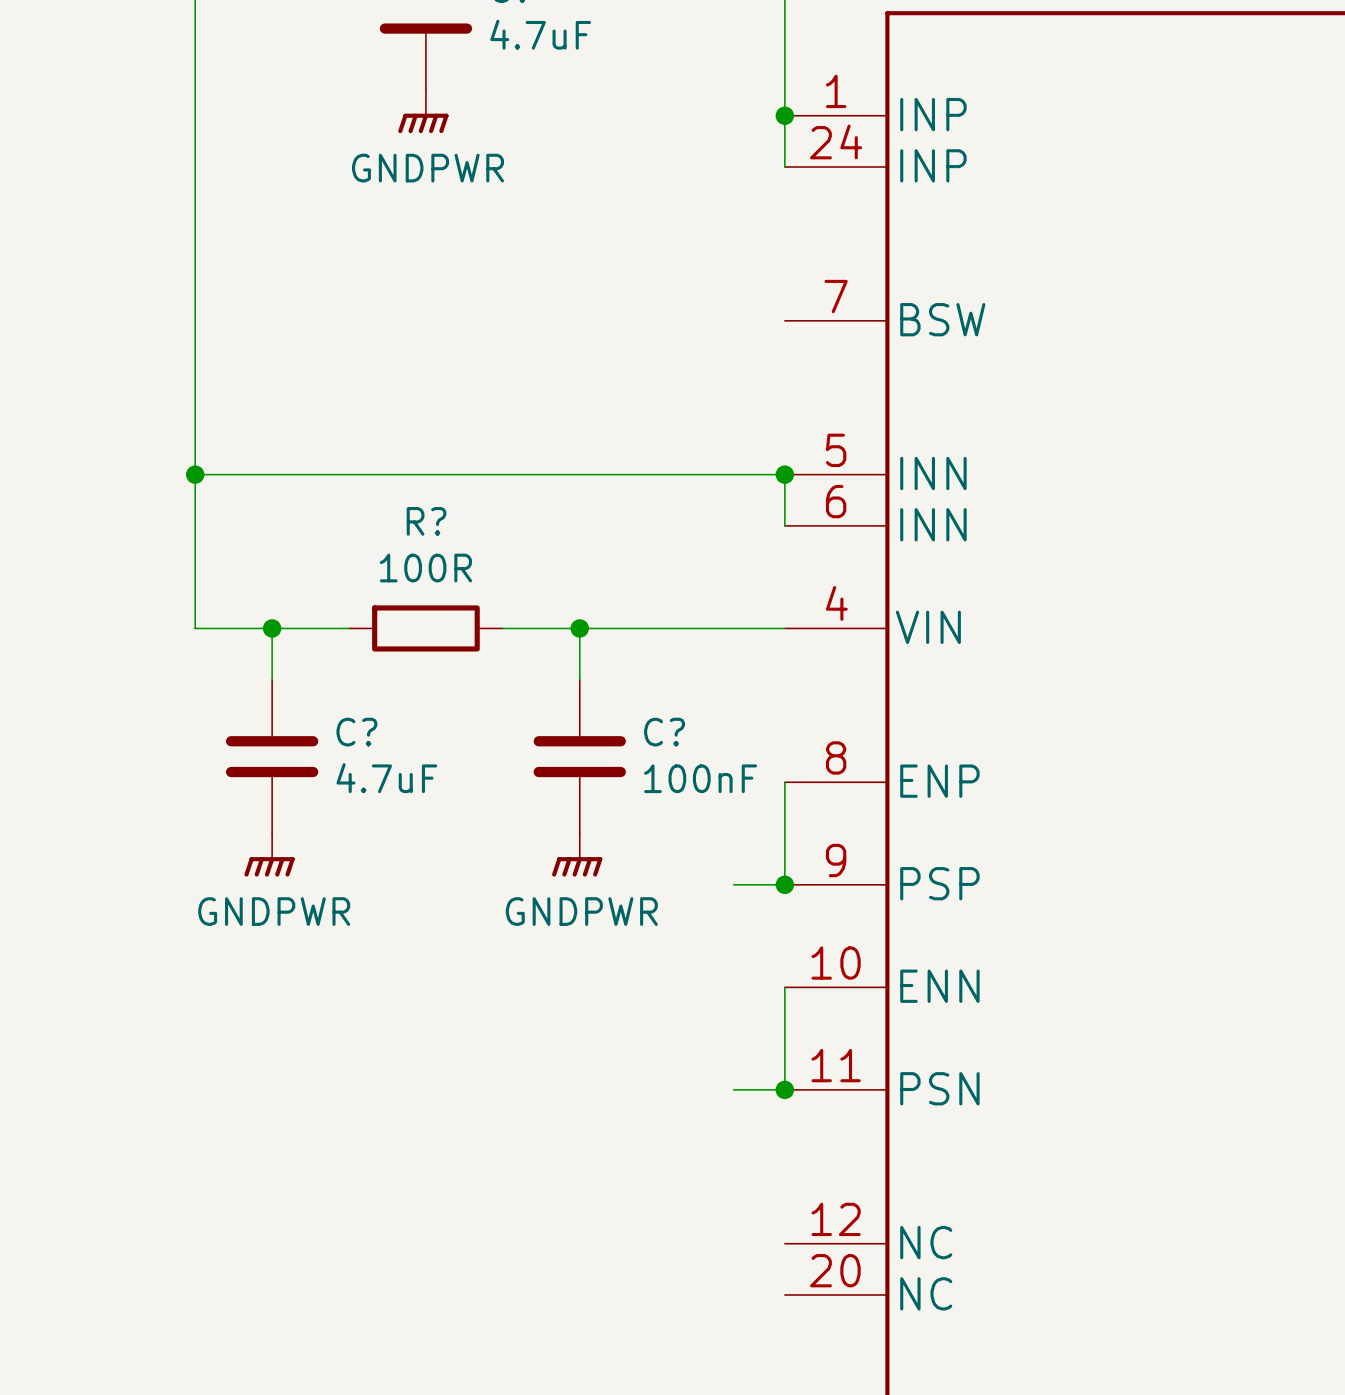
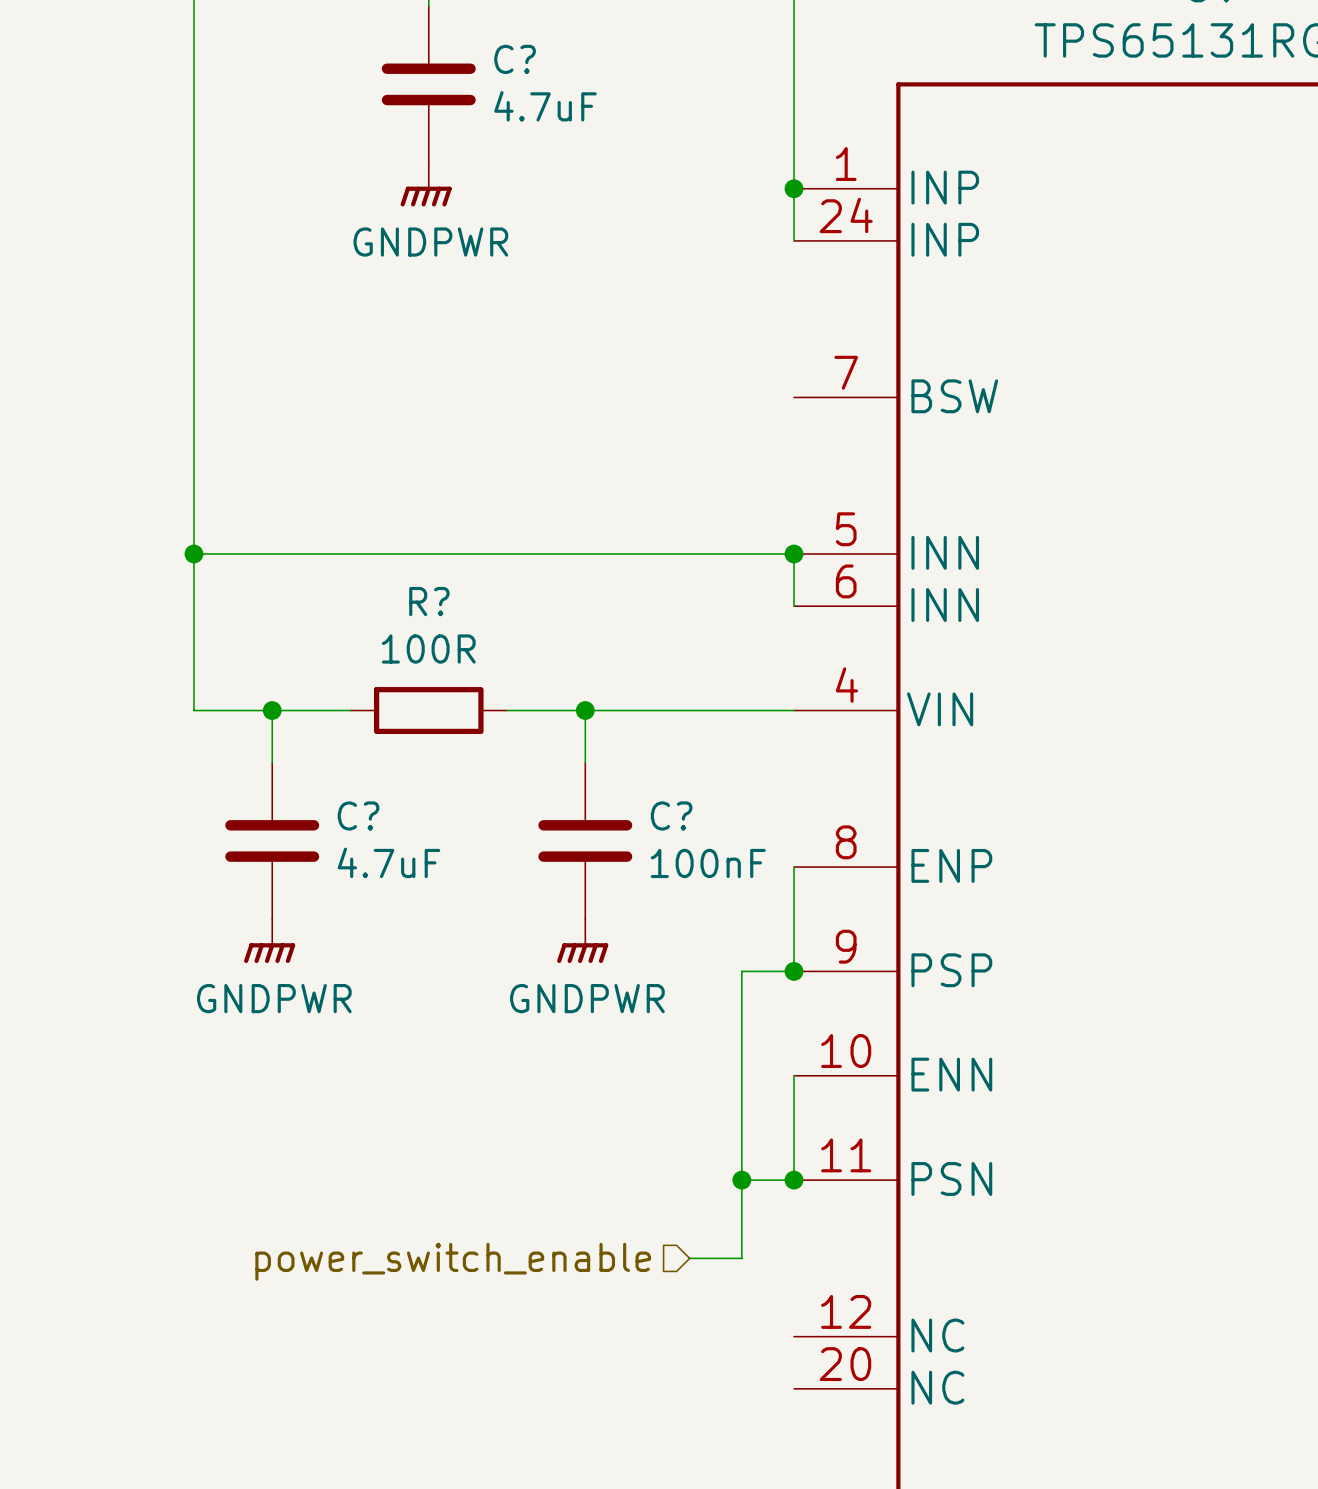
wire: none -> (741, 971) (741, 1258) (689, 1258)
junction: none -> (741, 1180)
hierarchical label: none -> power_switch_enable (453, 1261)

